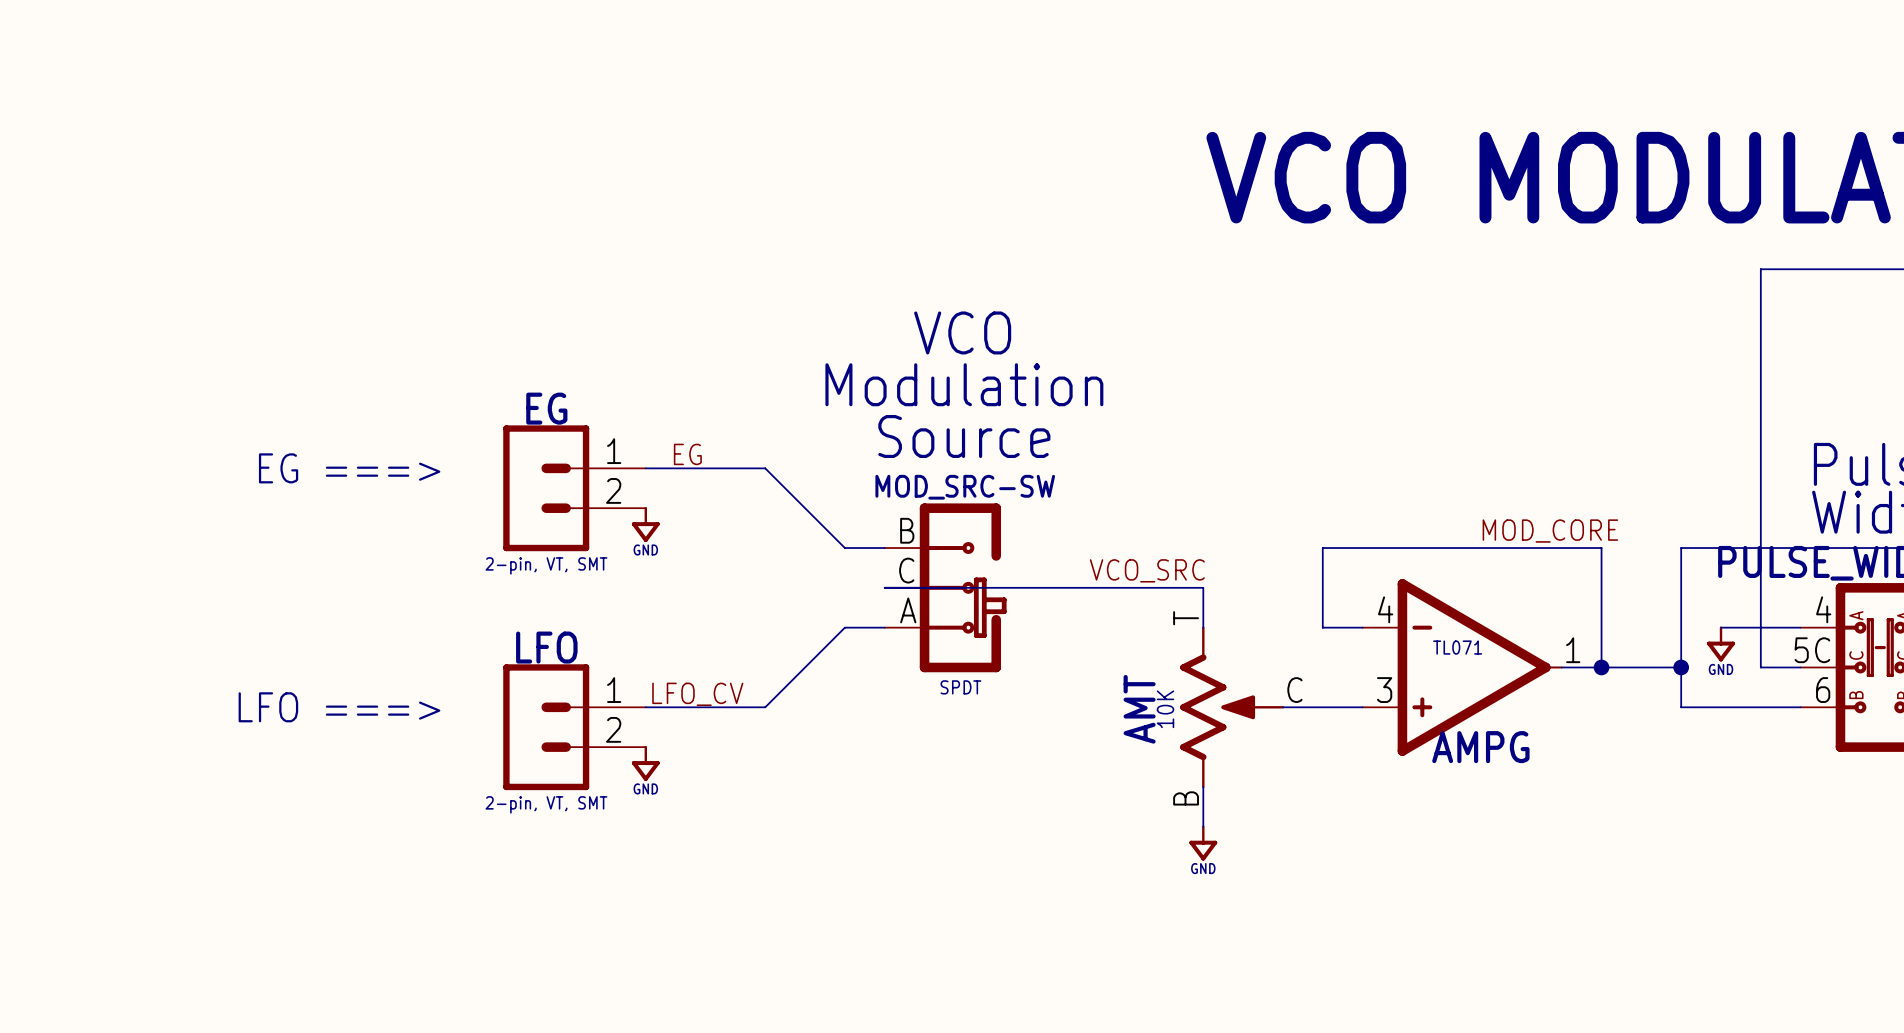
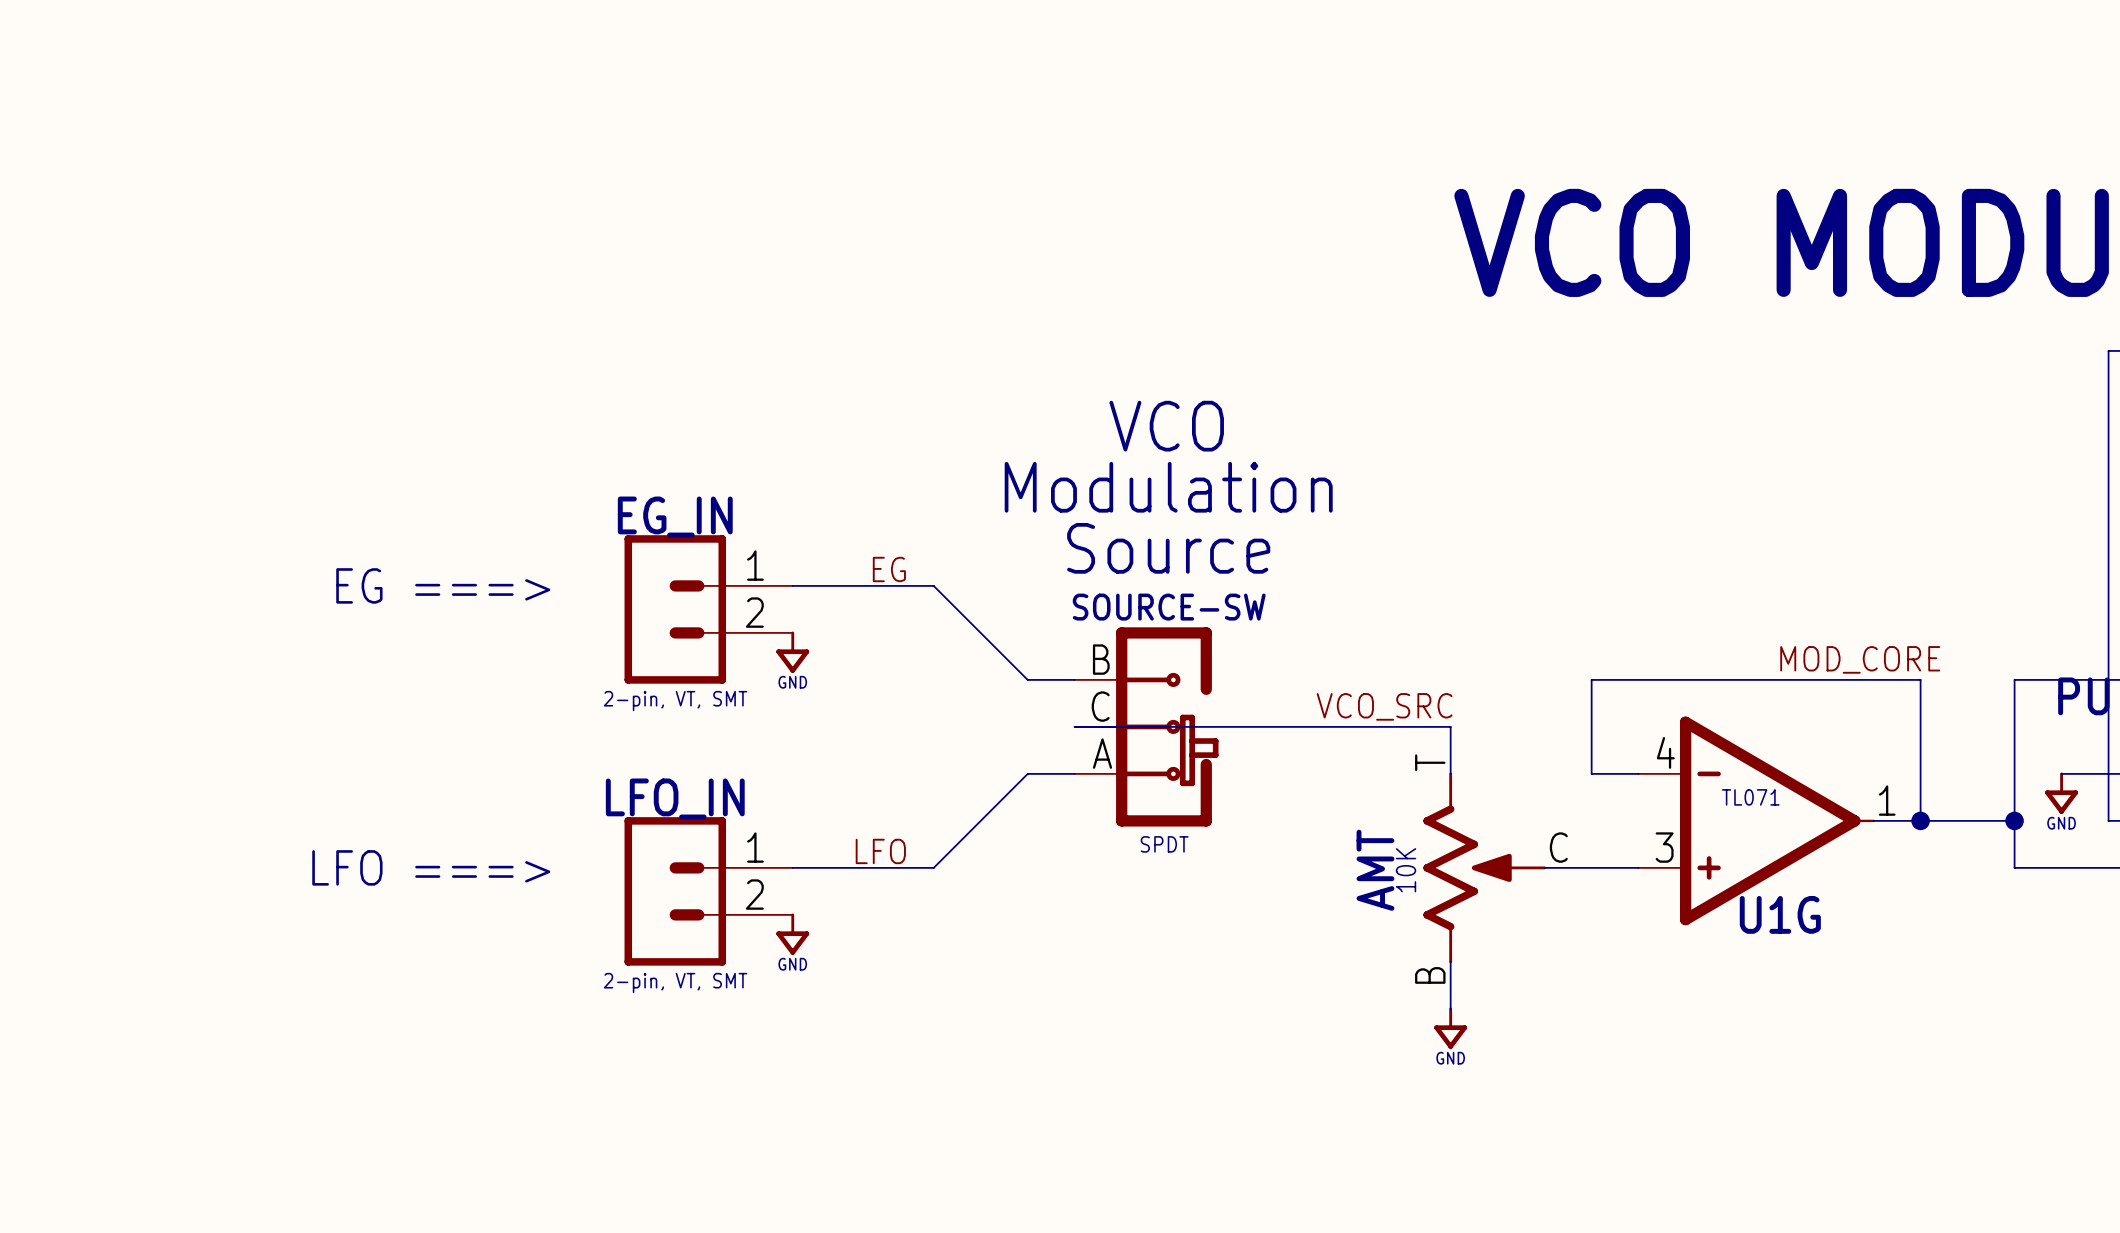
EG name: EG (546, 408) -> EG_IN (675, 517)
label position: EG (687, 454) -> EG (889, 569)
MOD_SRC-SW name: MOD_SRC-SW (965, 487) -> SOURCE-SW (1169, 607)
LFO name: LFO (546, 647) -> LFO_IN (675, 798)
label: LFO_CV (697, 694) -> LFO (880, 851)
AMPG name: AMPG (1480, 747) -> U1G (1780, 914)

